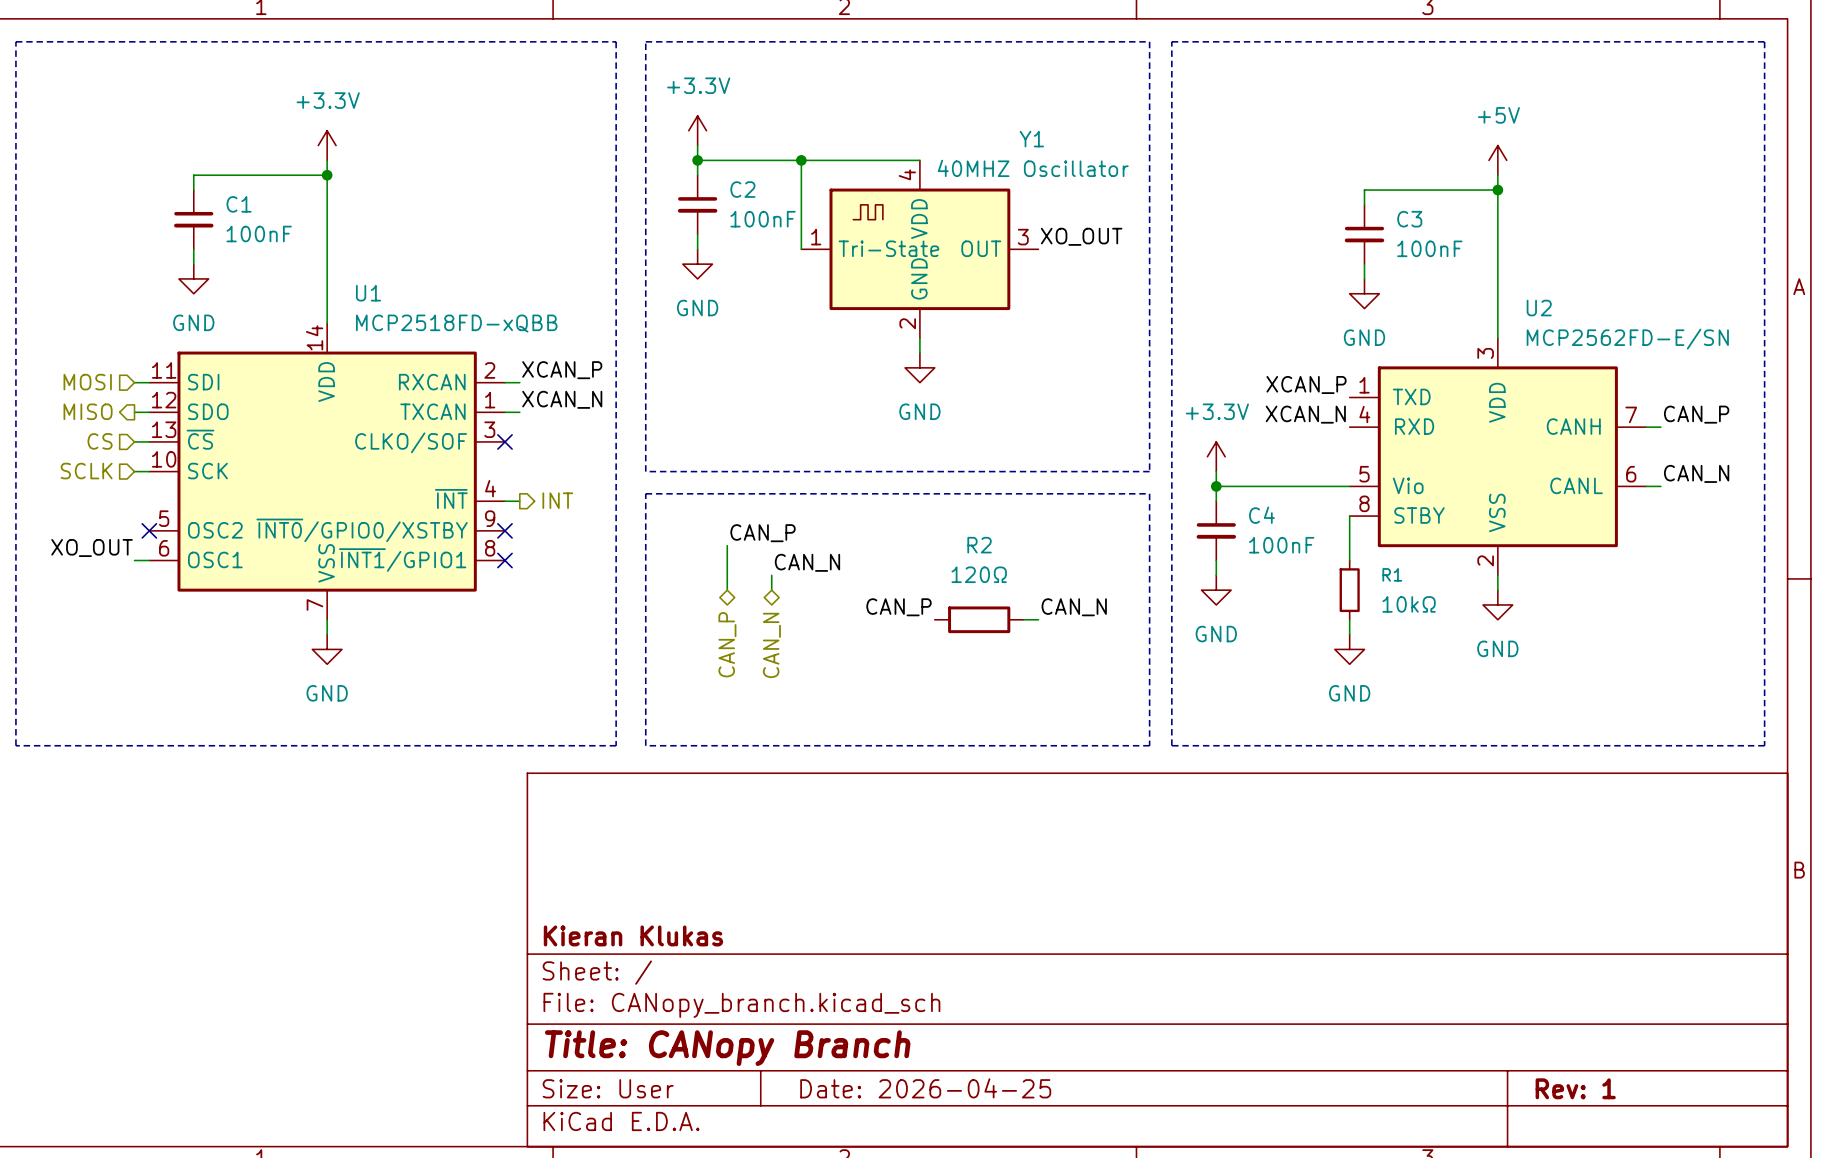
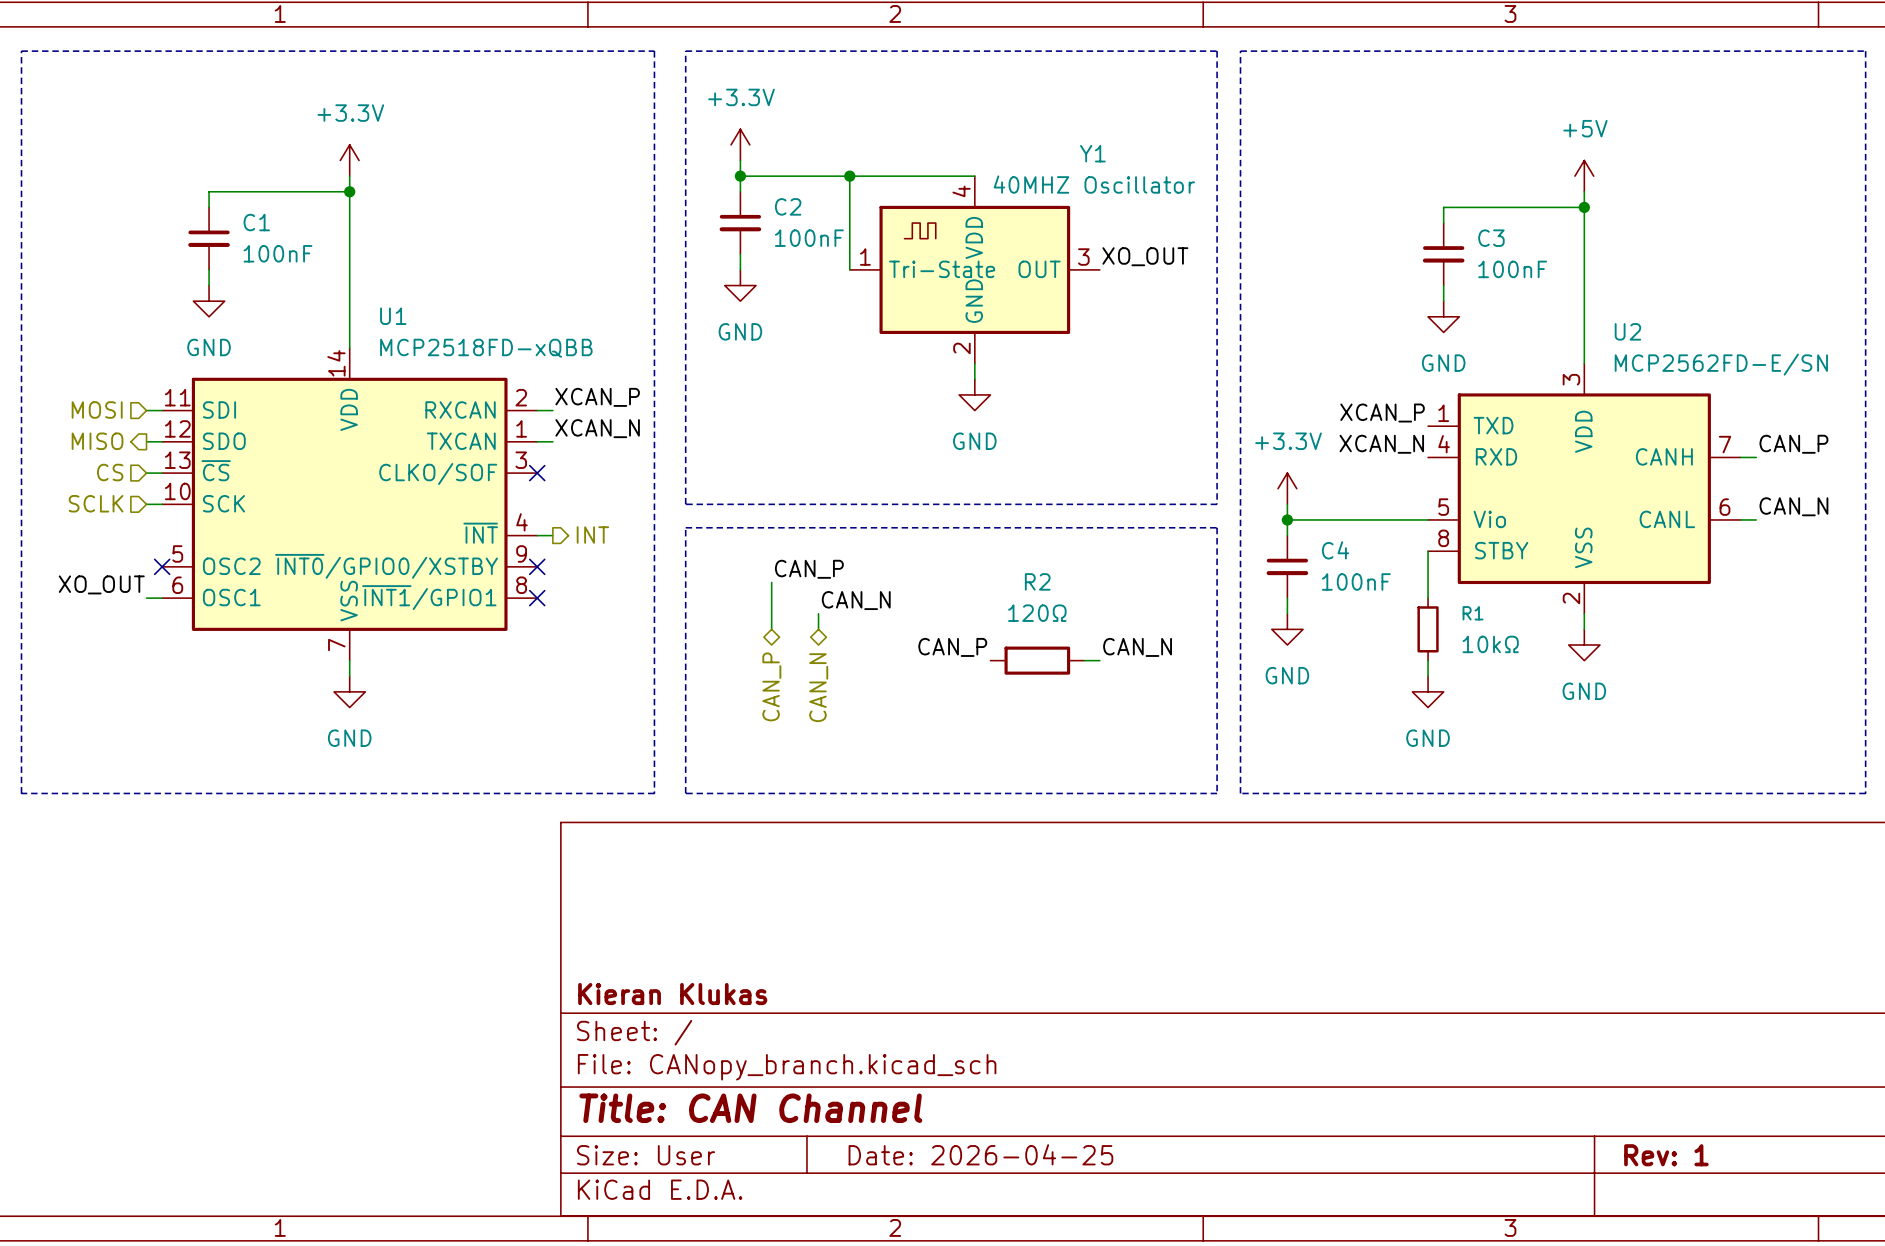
title block: Title: CANopy Branch (727, 1048) -> Title: CAN Channel (750, 1108)

